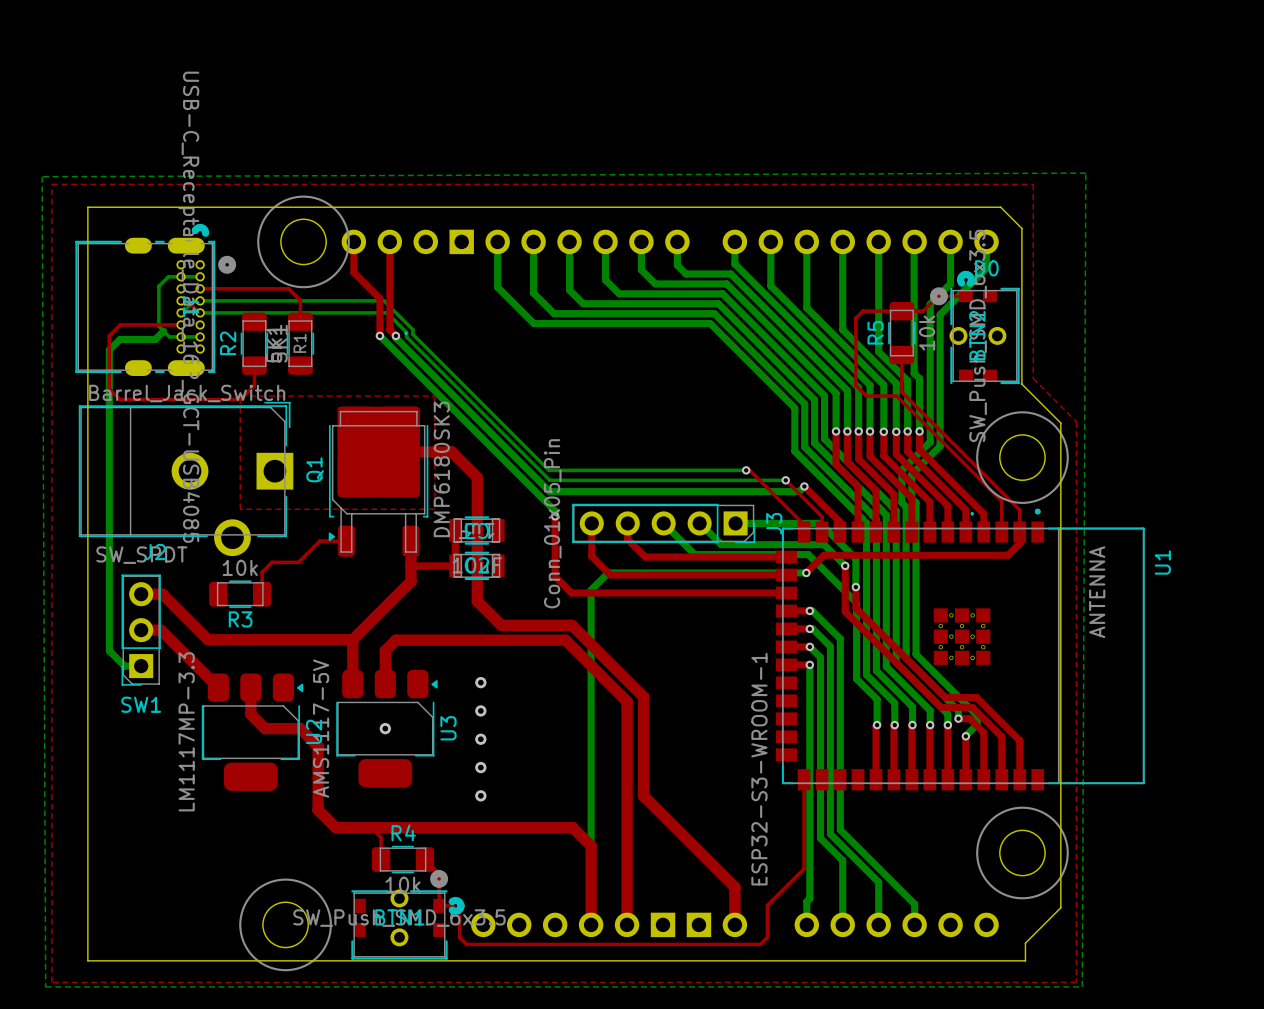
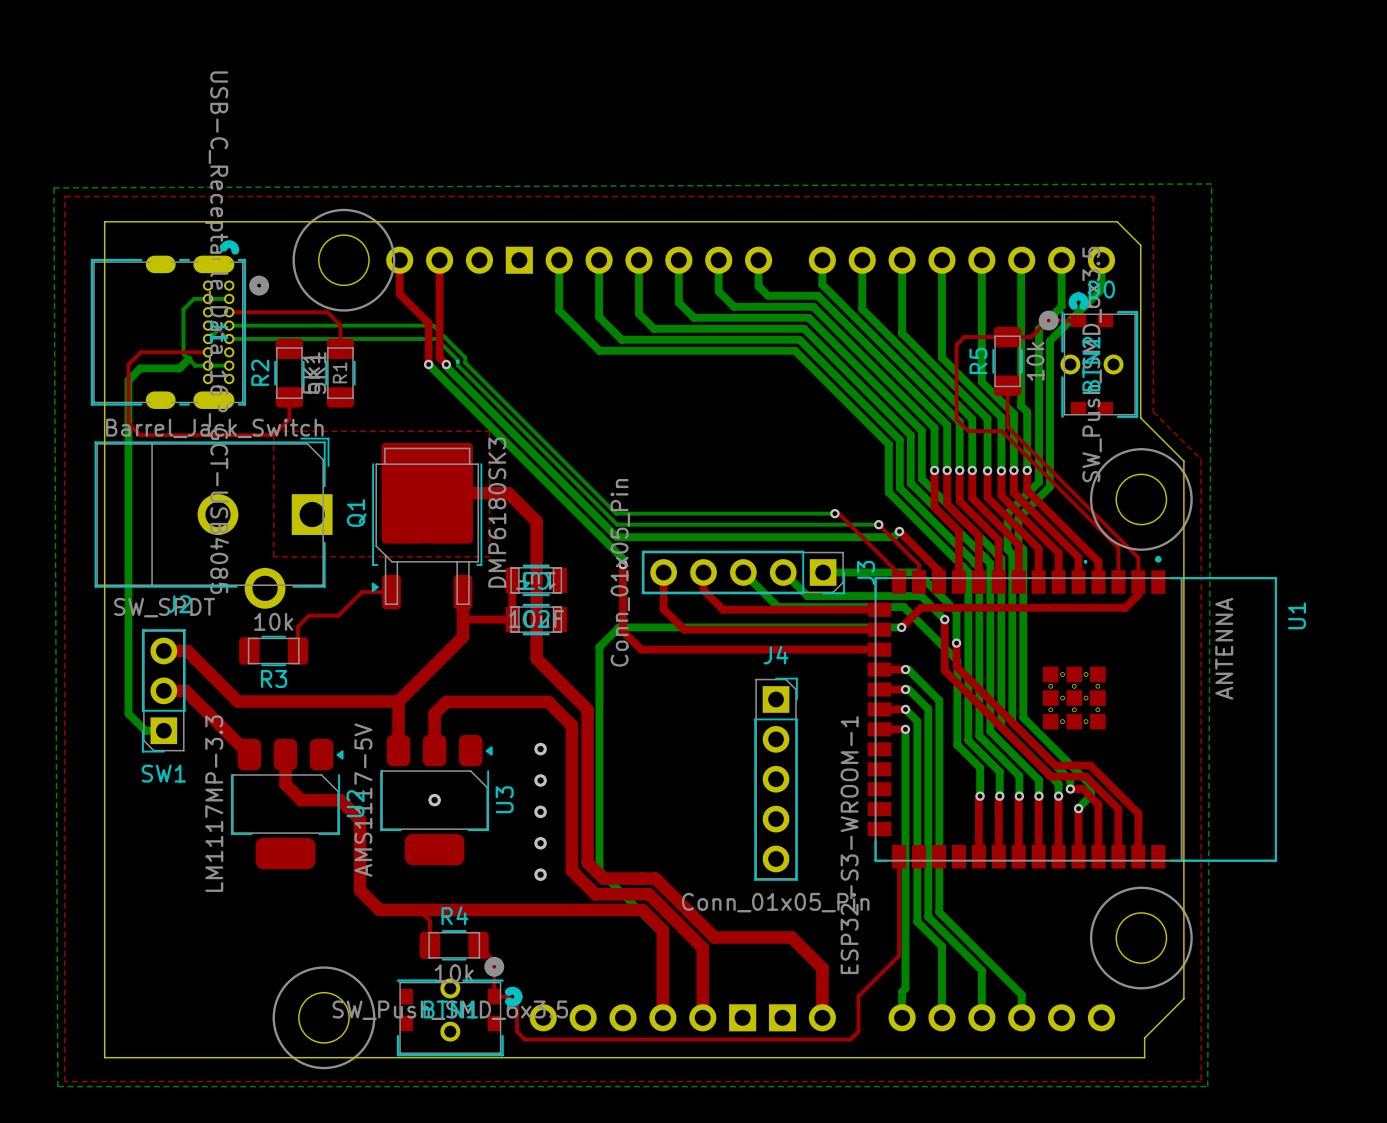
bottom track: (608, 572) (591, 590) (591, 849) -> (681, 627) (619, 627) (599, 647) (599, 870) (662, 934)
top track: (501, 625) (571, 625) (643, 697) (643, 795) (734, 887) -> (563, 685) (587, 709) (587, 862) (603, 878) (655, 878) (714, 937) (791, 937) (822, 968) (822, 975)
top track: (487, 640) (565, 640) (627, 701) (627, 861) -> (548, 701) (571, 725) (571, 870) (595, 894) (649, 894) (702, 947)
J4: none -> Conn_01x05_Pin (776, 779)

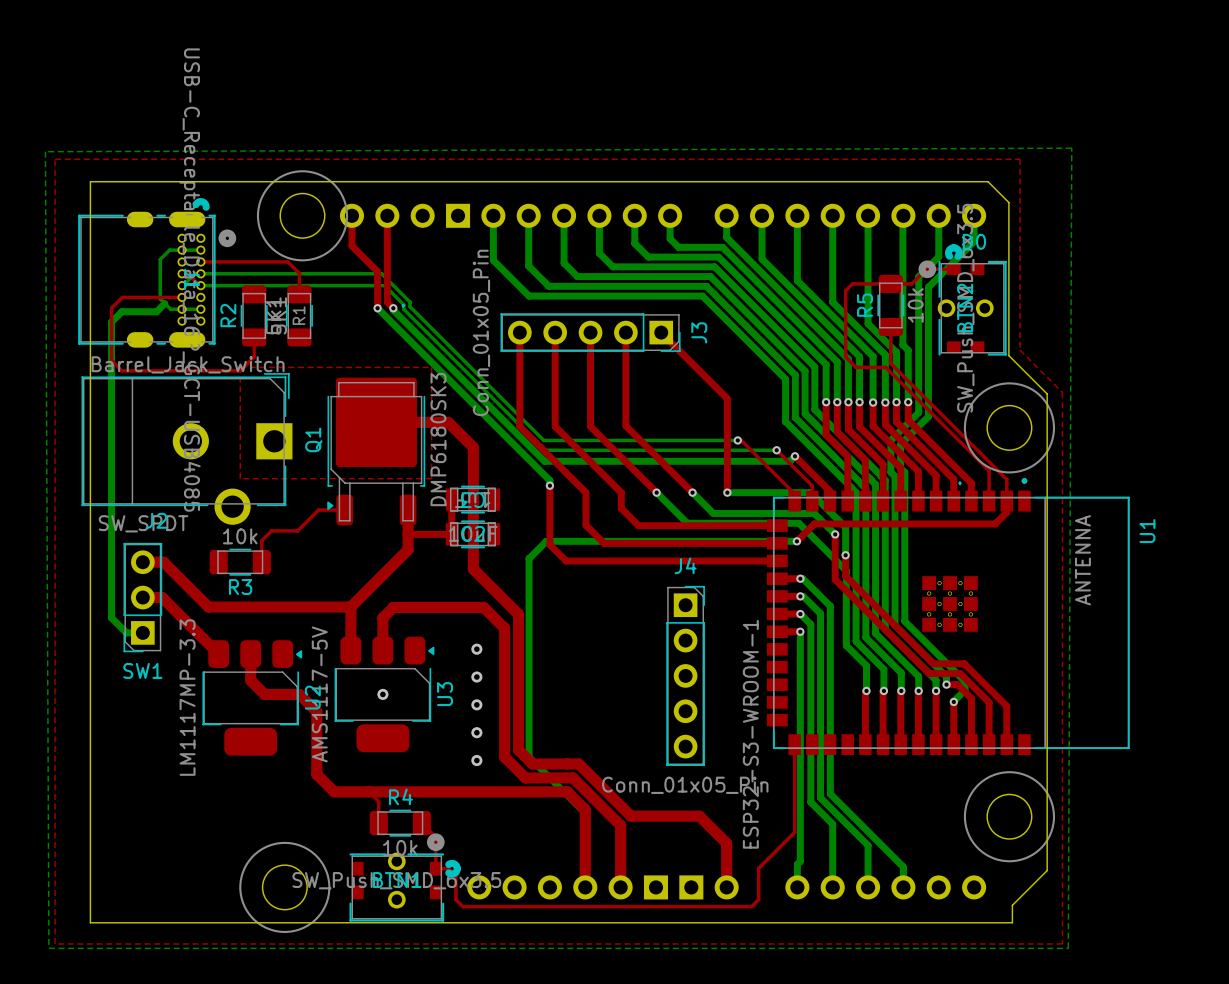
top track: none -> (519, 332) (519, 426) (585, 492)
top track: none -> (555, 332) (555, 426) (621, 492)
top track: none -> (590, 332) (590, 426) (656, 492)
top track: none -> (625, 332) (625, 425) (692, 492)
top track: none -> (661, 332) (727, 398) (727, 492)
J3 position: (743, 572) -> (590, 332)
via: none -> (656, 492)
via: none -> (692, 492)
via: none -> (727, 492)

